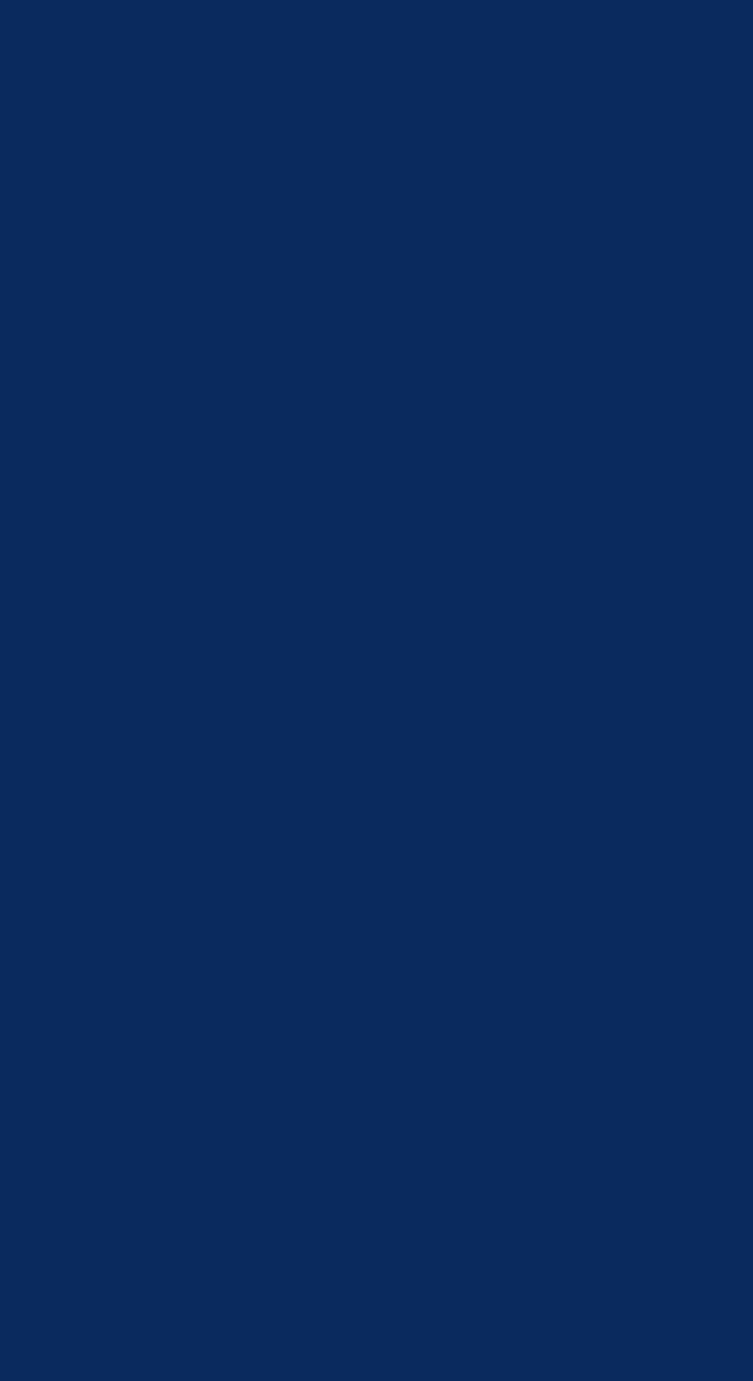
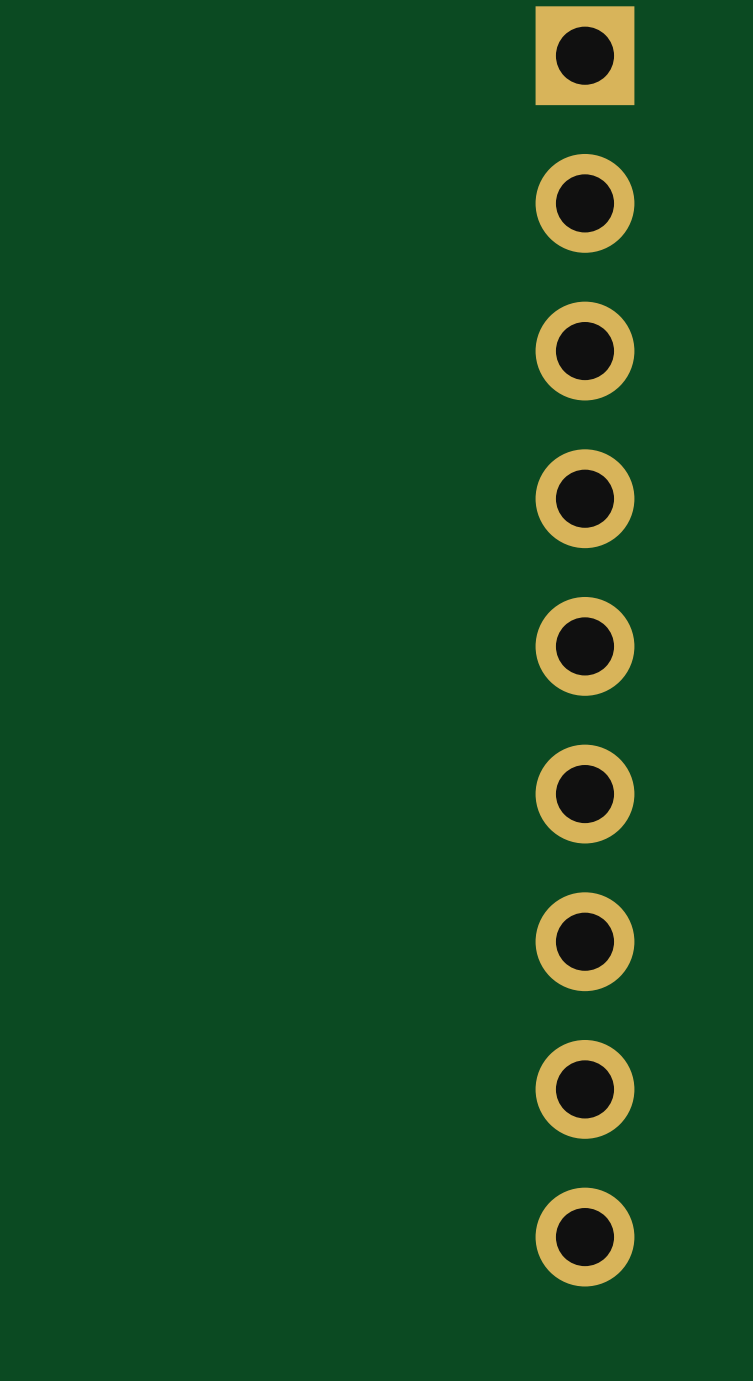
part: none -> (584, 646)

